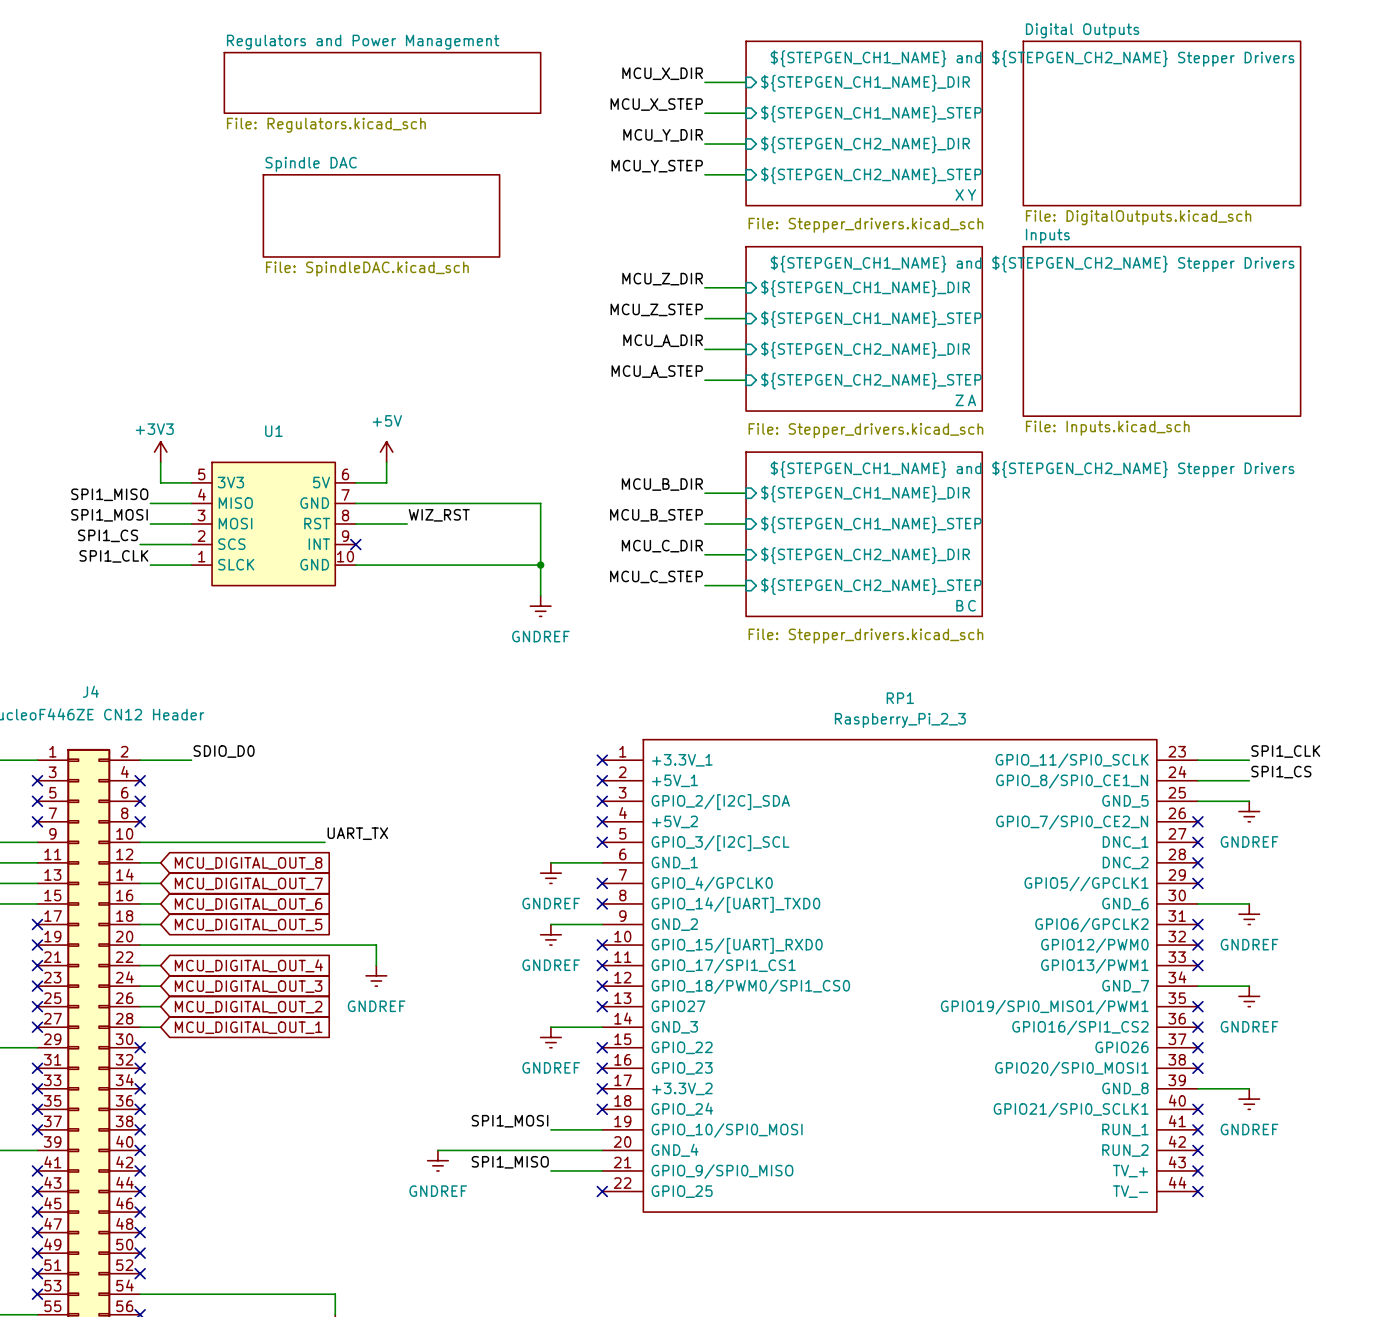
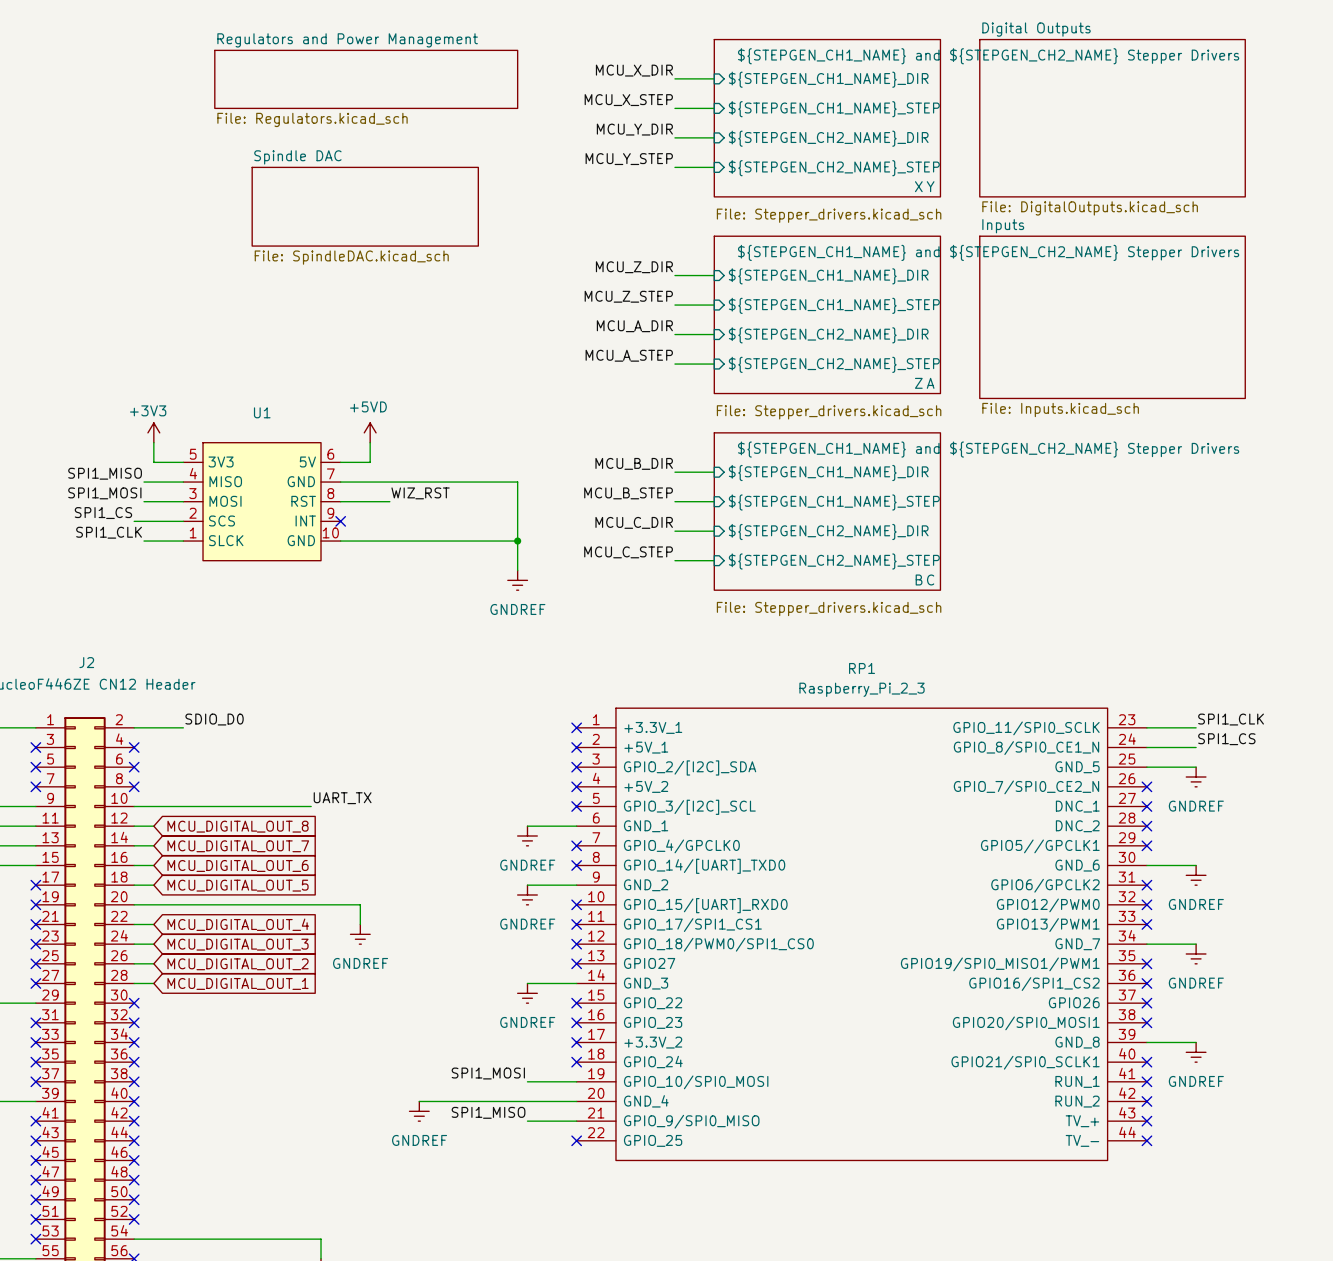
power symbol: +5V (386, 452) -> +5VD (370, 432)
J4 name: J4 (90, 691) -> J2 (86, 662)

